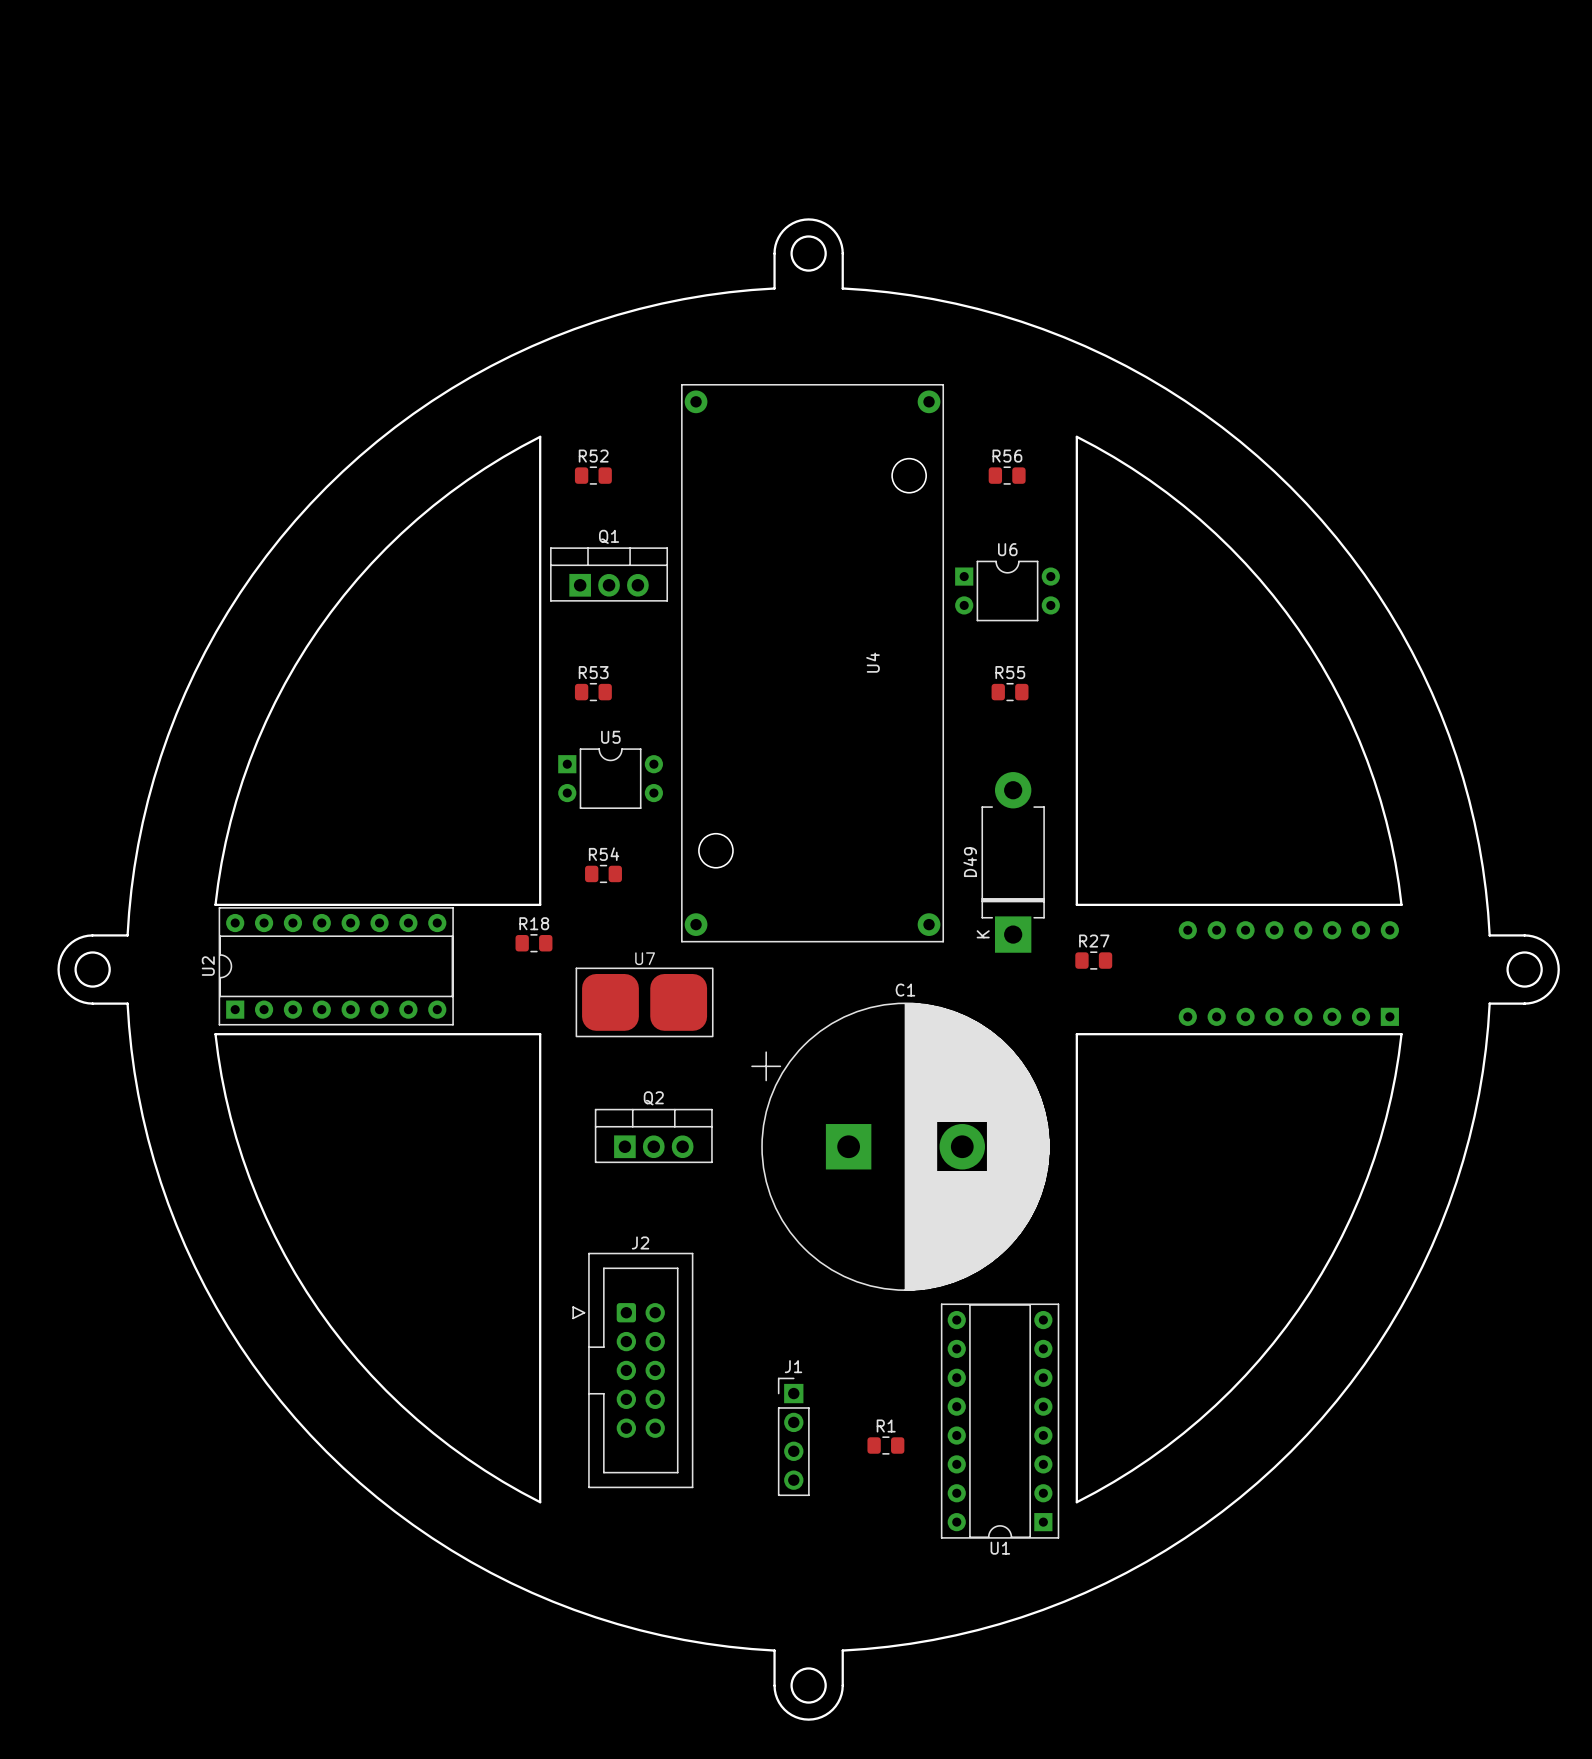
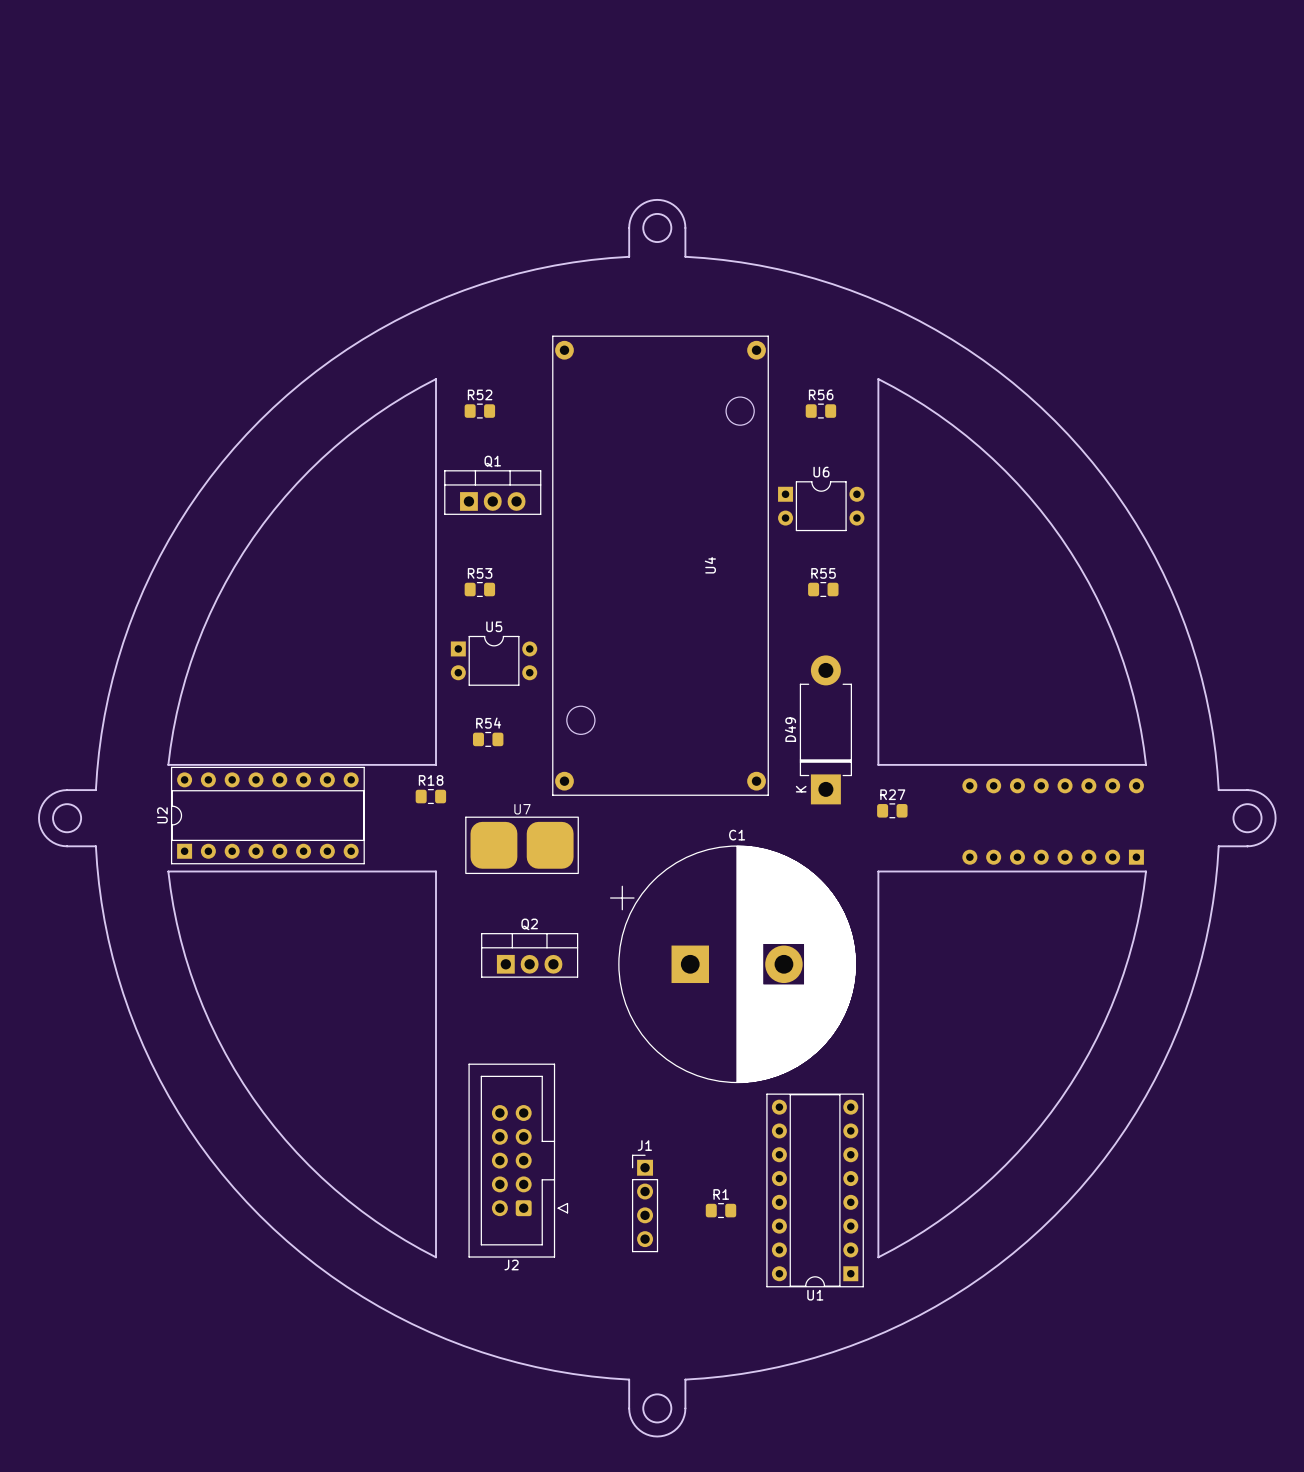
J2 rotation: 0° (632, 1370) -> 180° (518, 1160)

